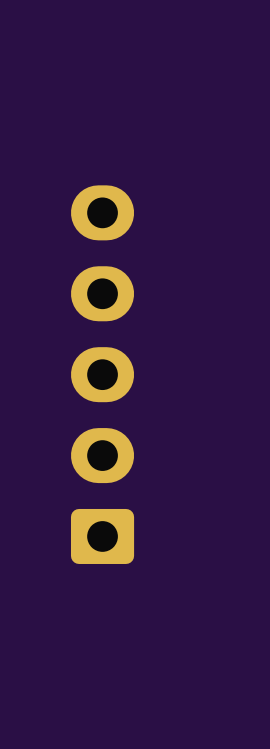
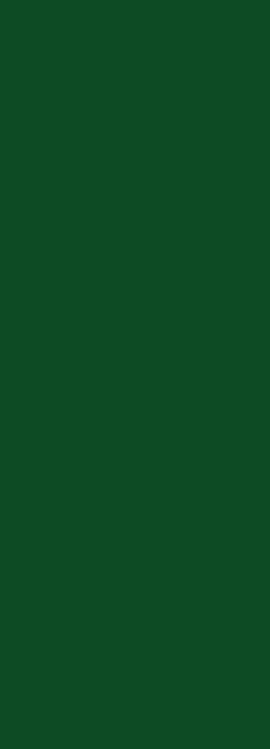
part: (102, 374) -> none

